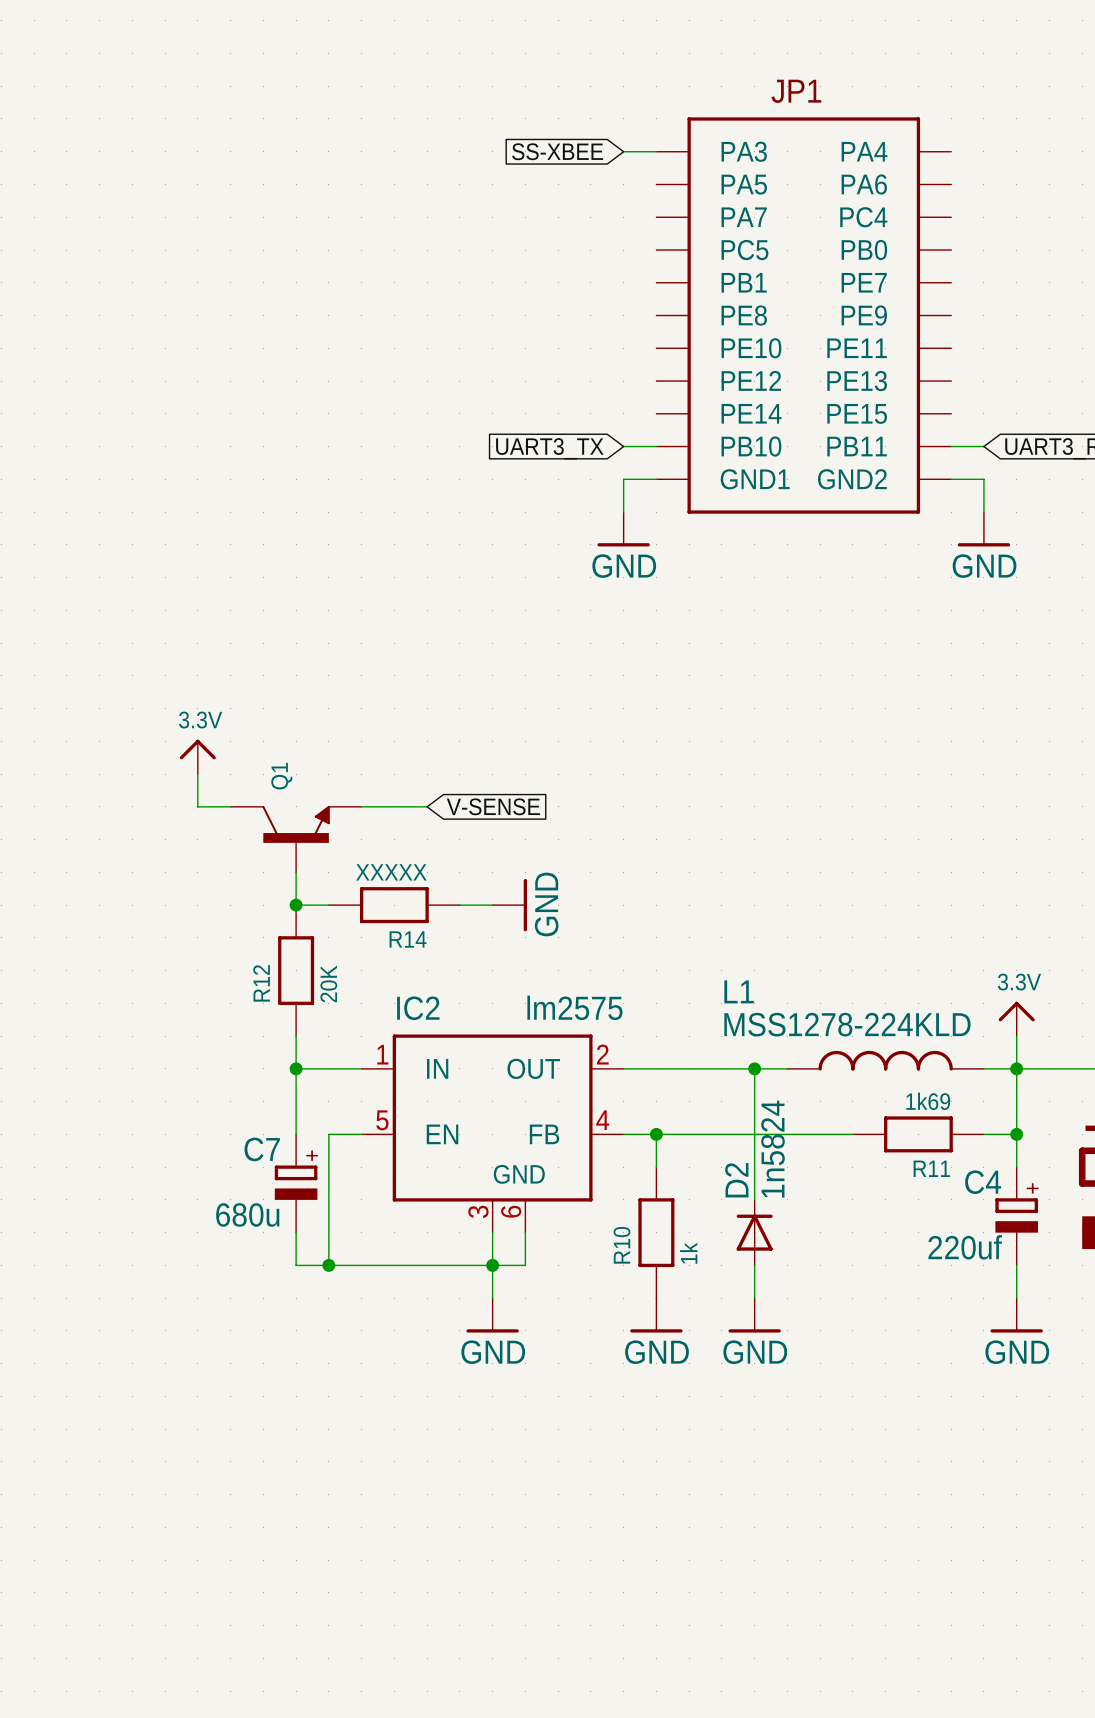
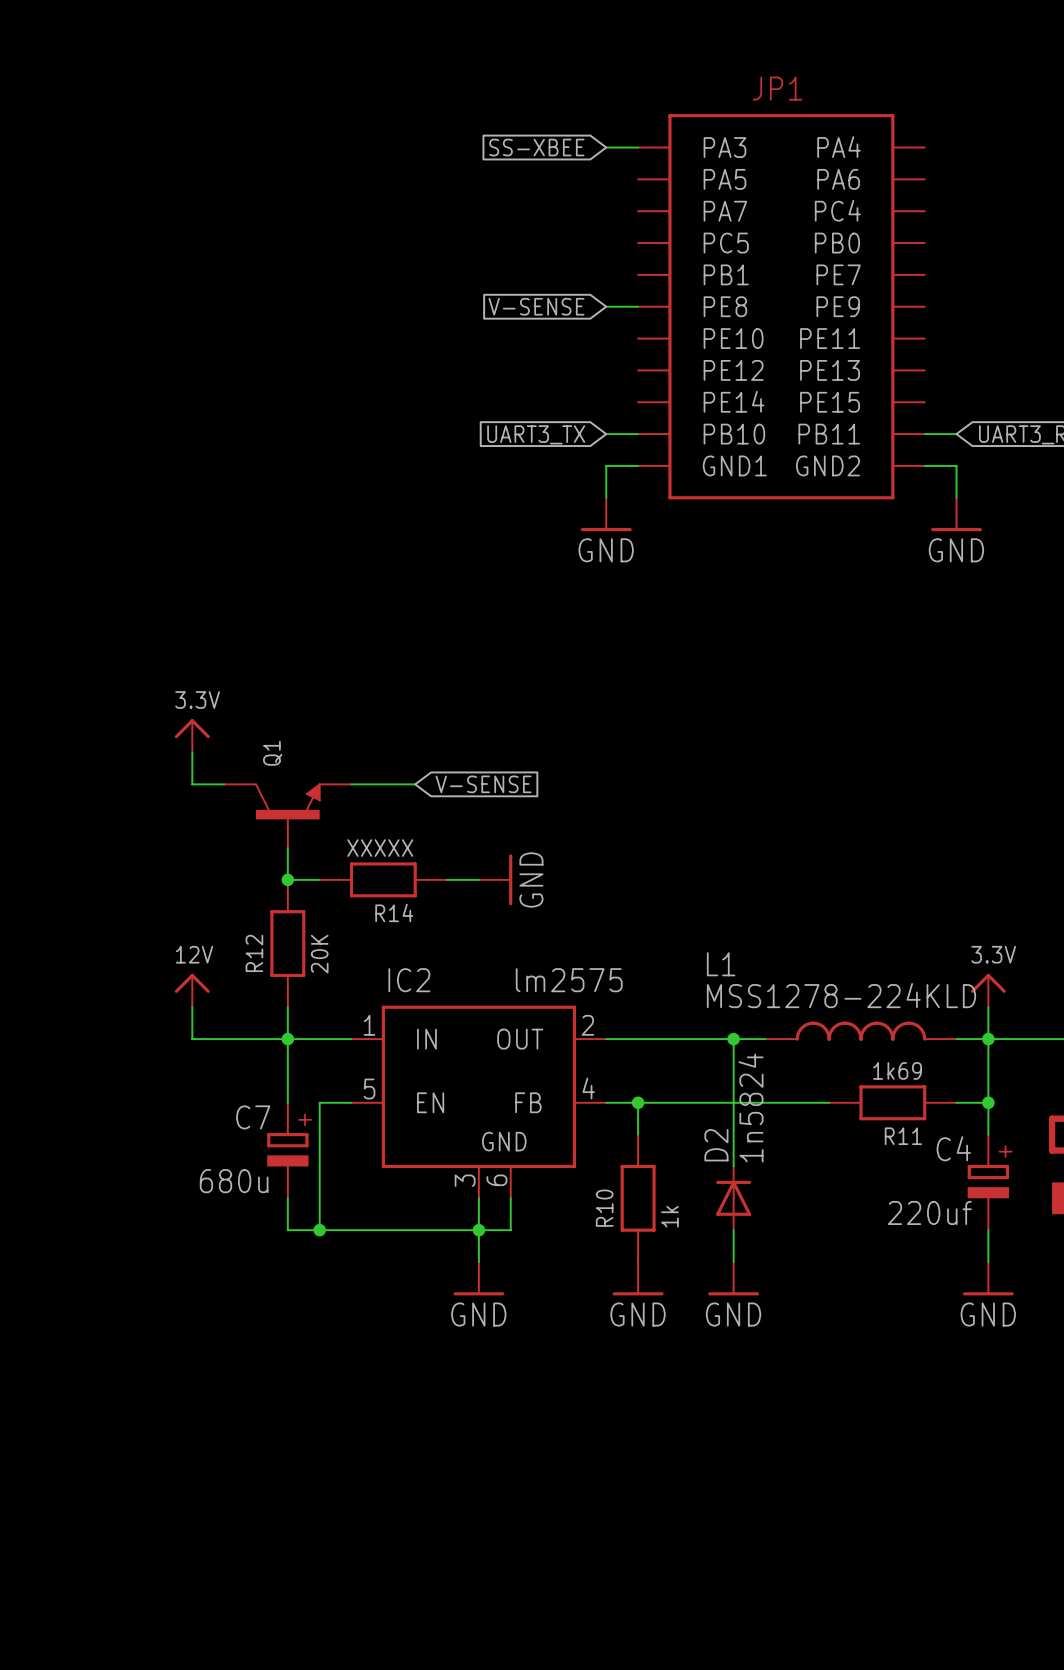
global label: none -> V-SENSE (536, 306)
wire: none -> (606, 306) (638, 306)
power symbol: none -> 12V (192, 990)
wire: none -> (192, 1007) (192, 1039) (287, 1039)

